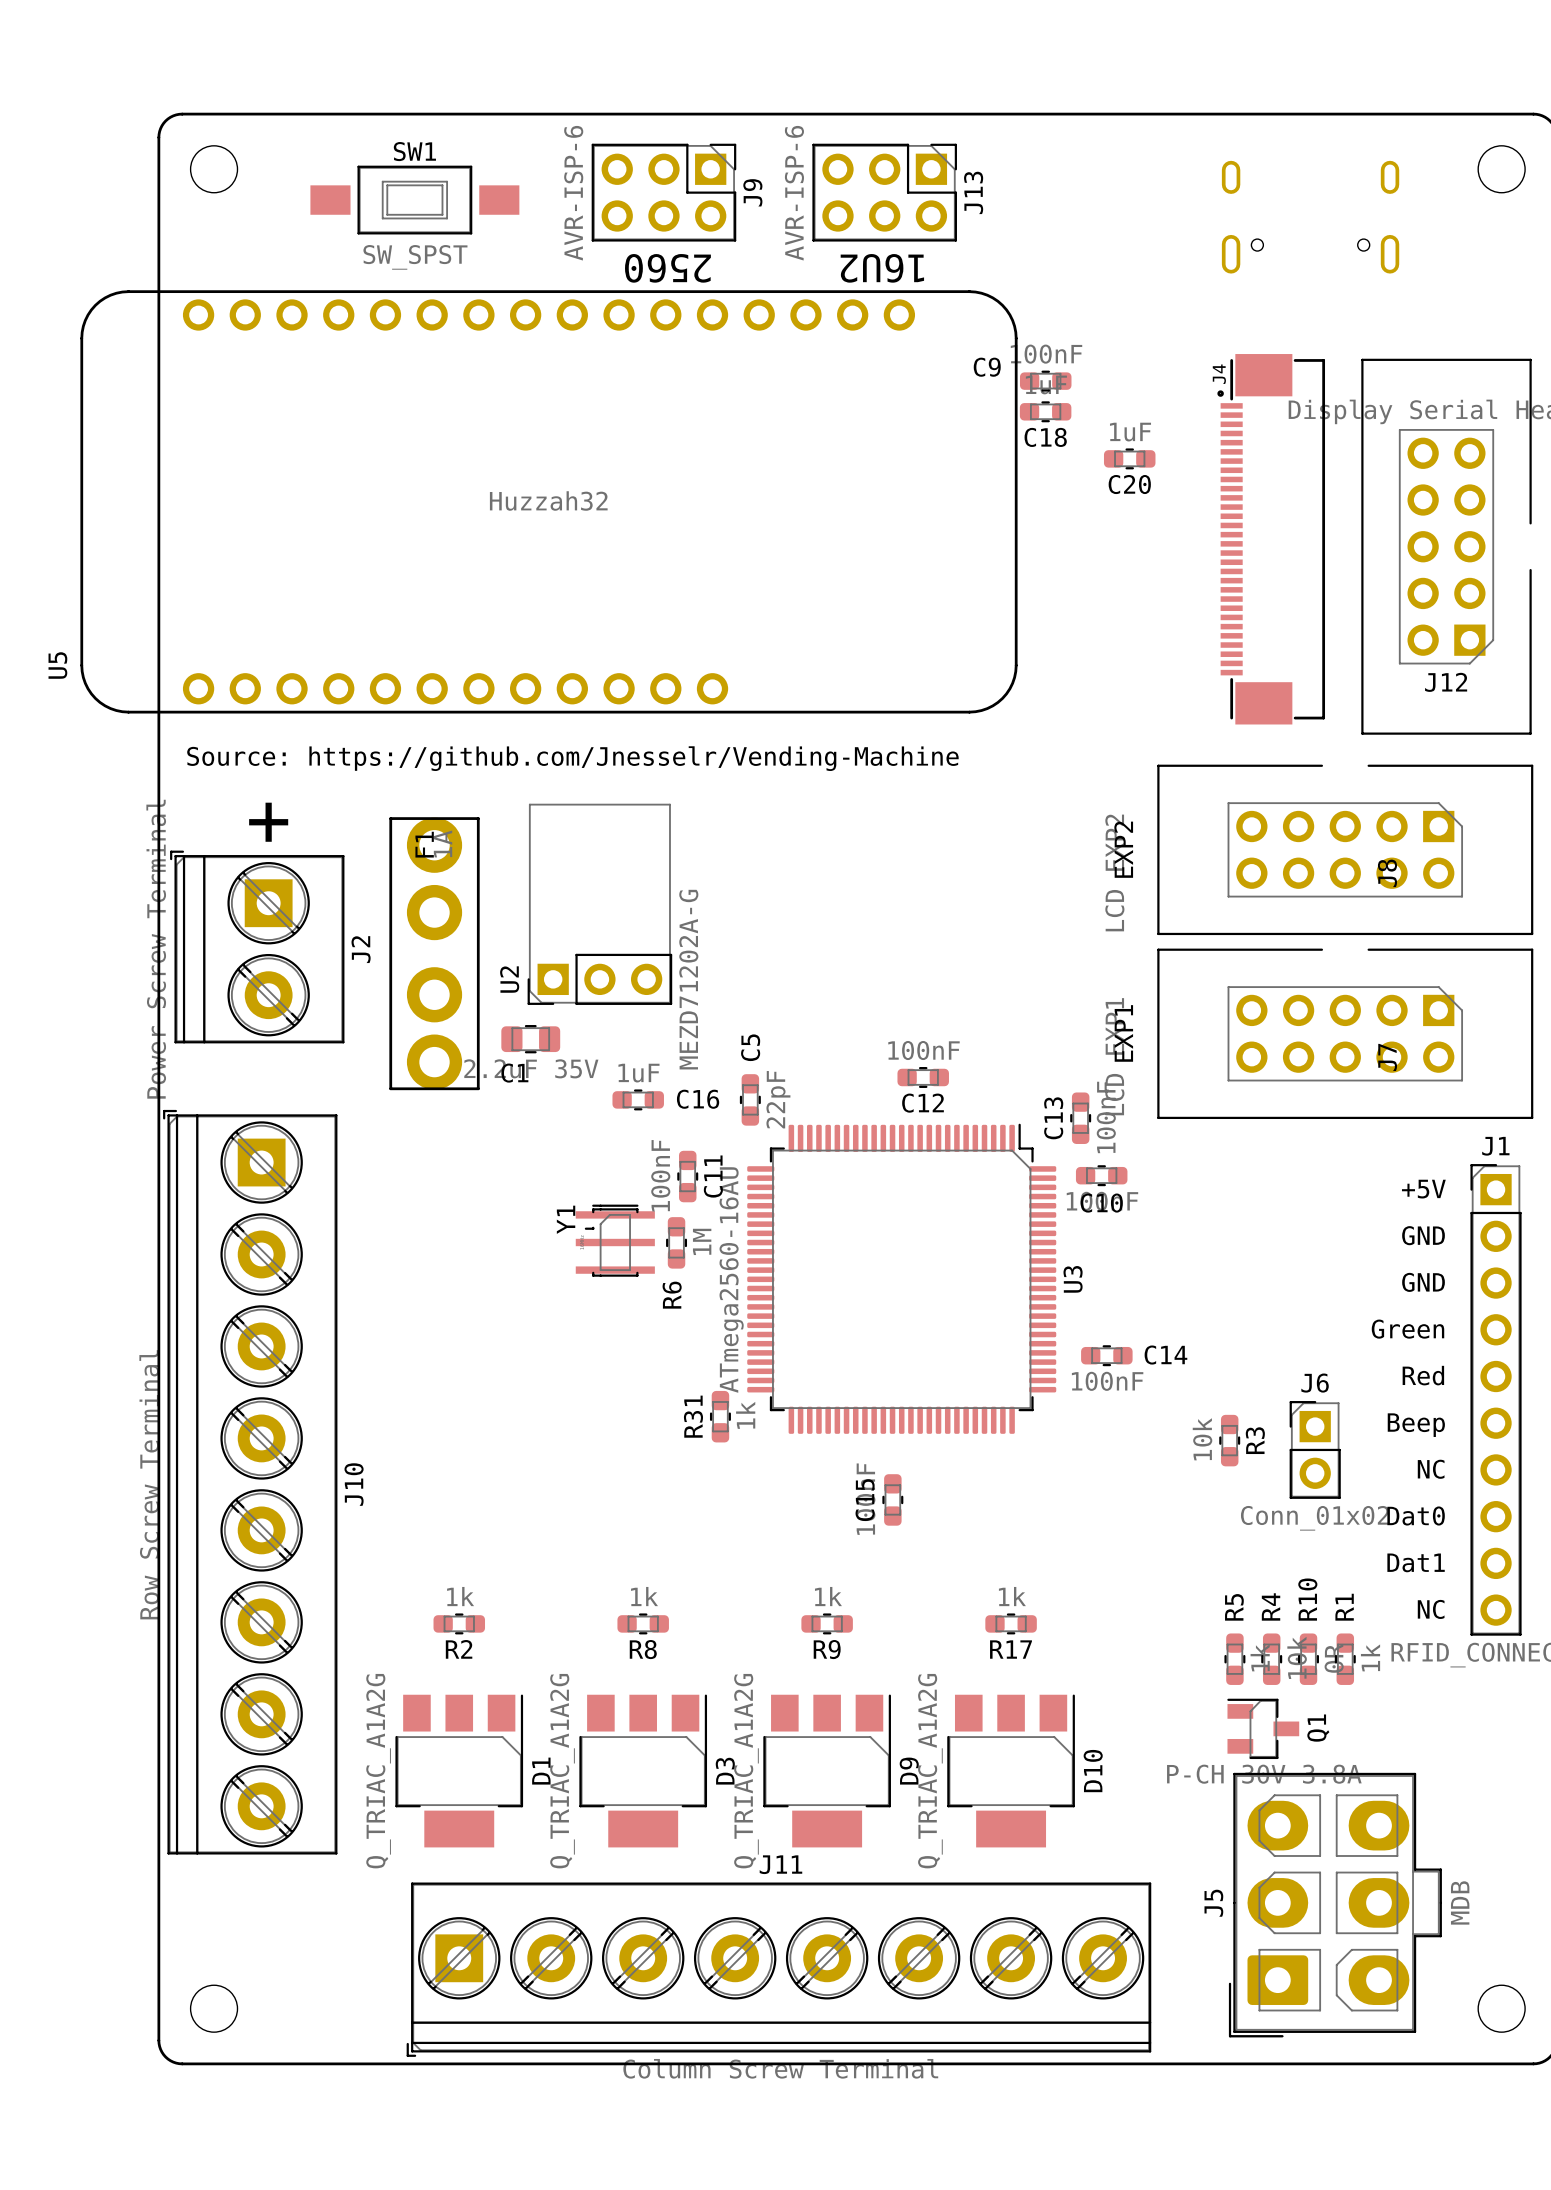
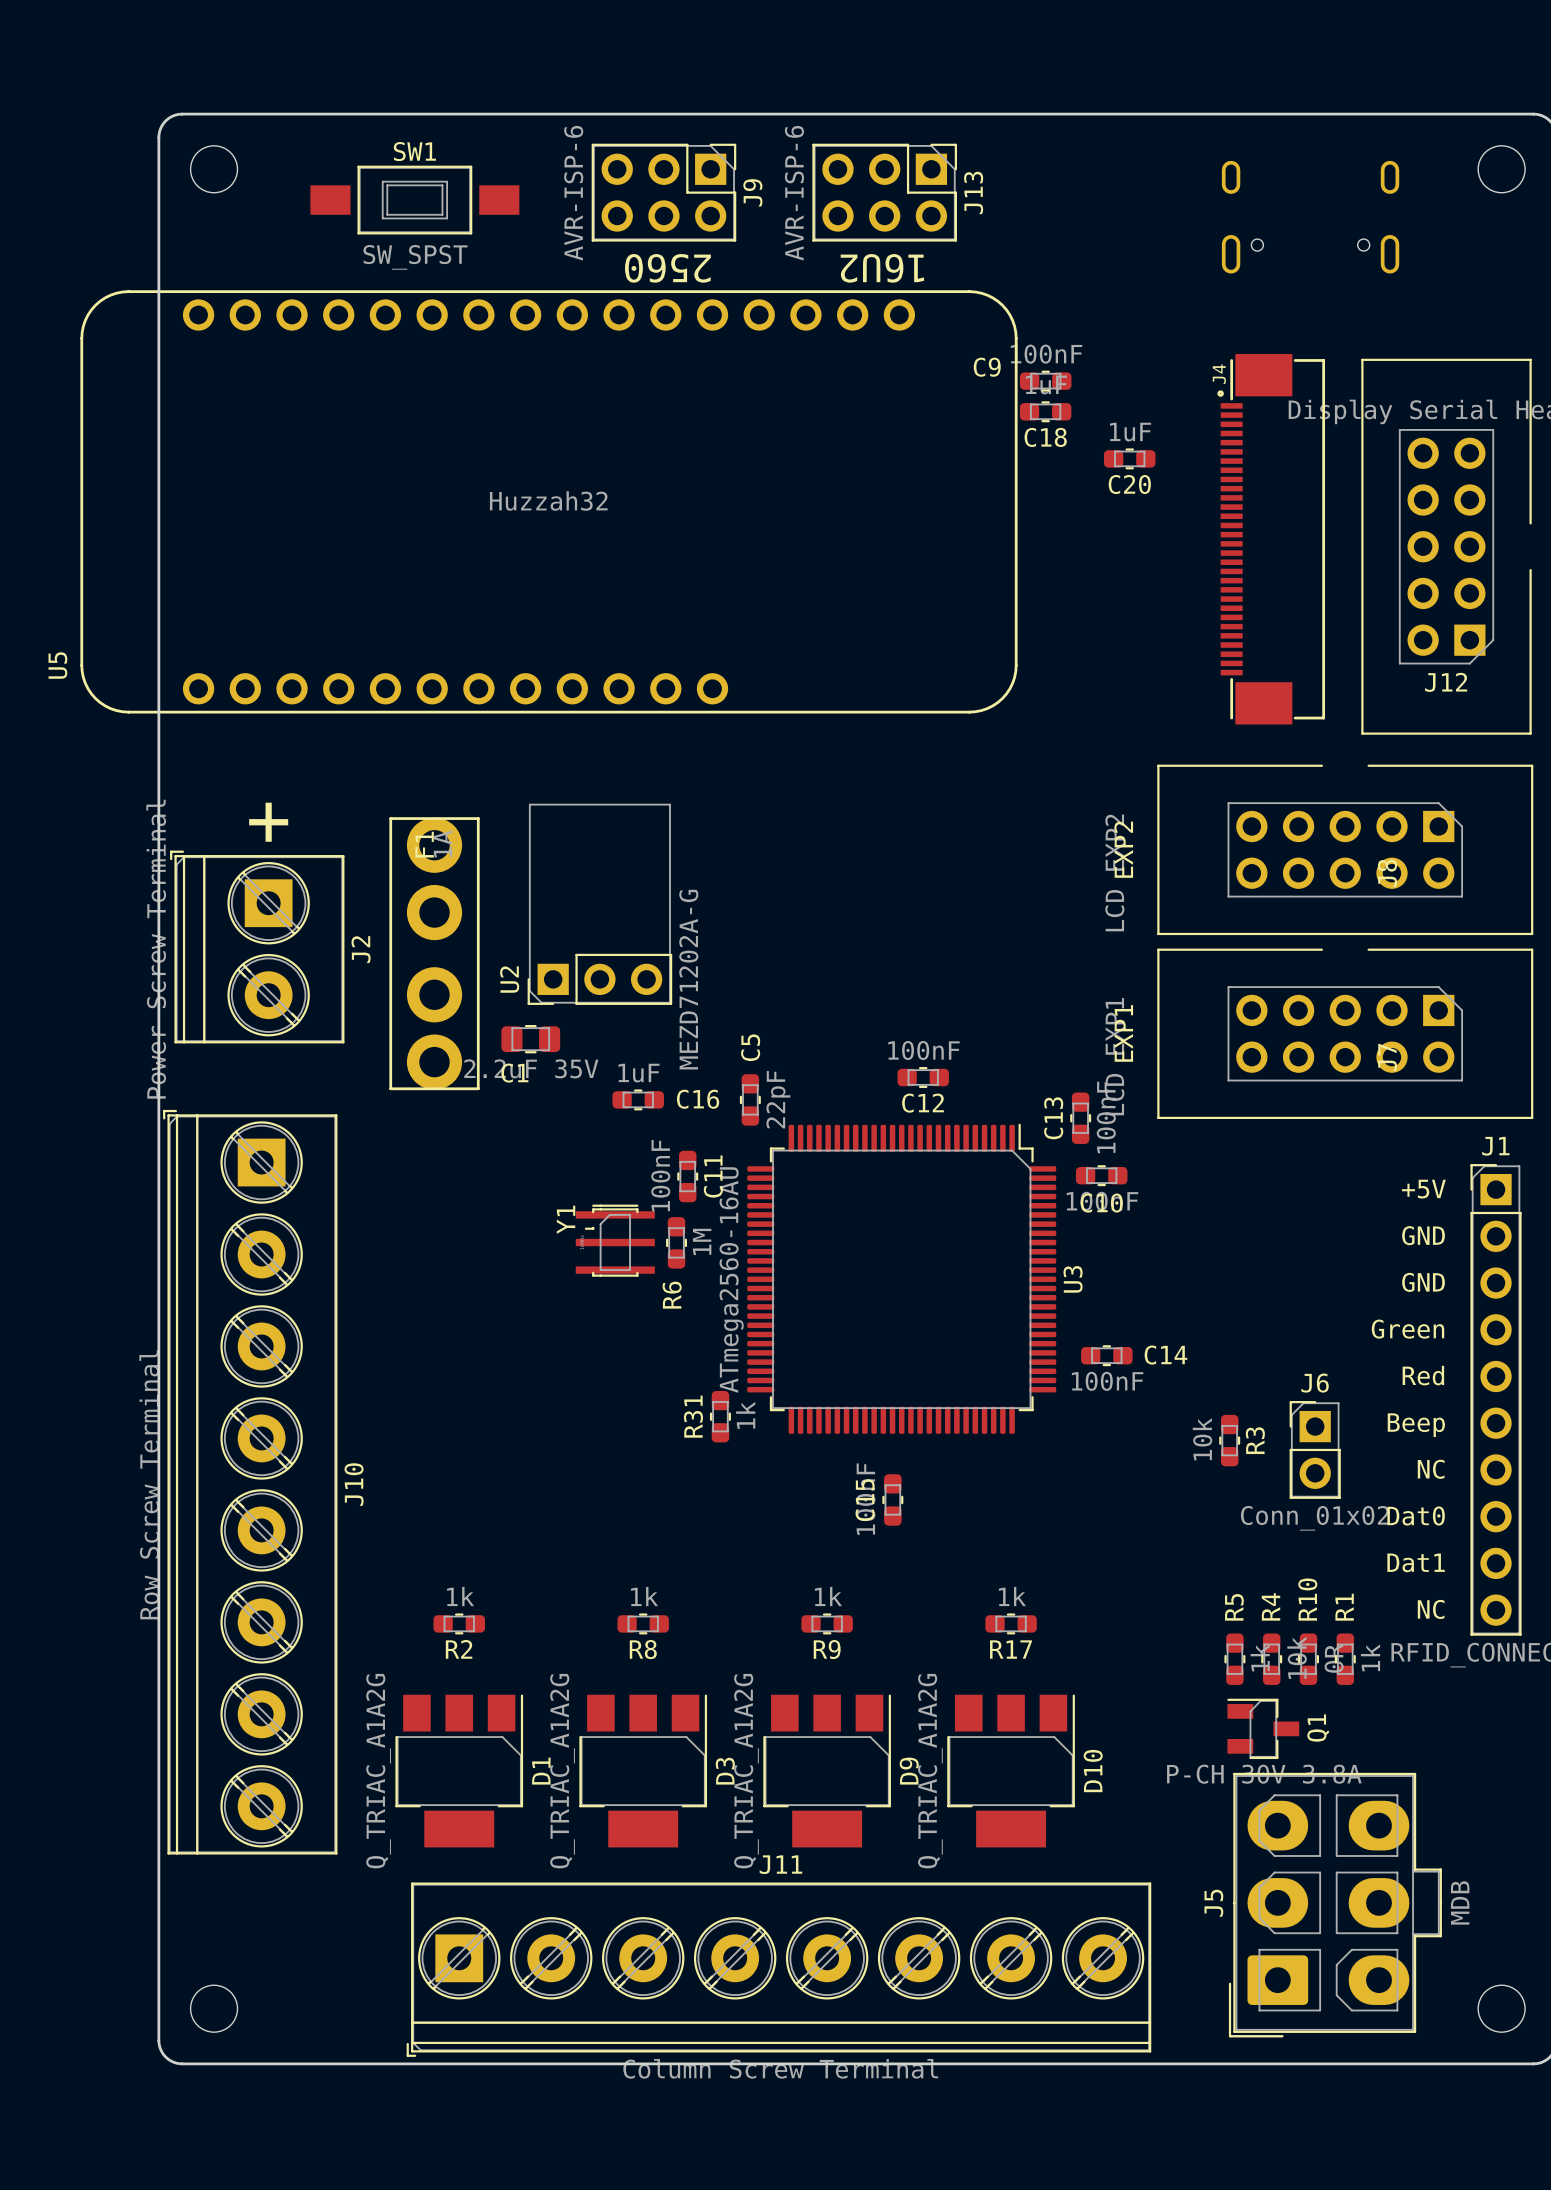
text: Source: https://github.com/Jnesselr/Vending-Machine (572, 758) -> none

